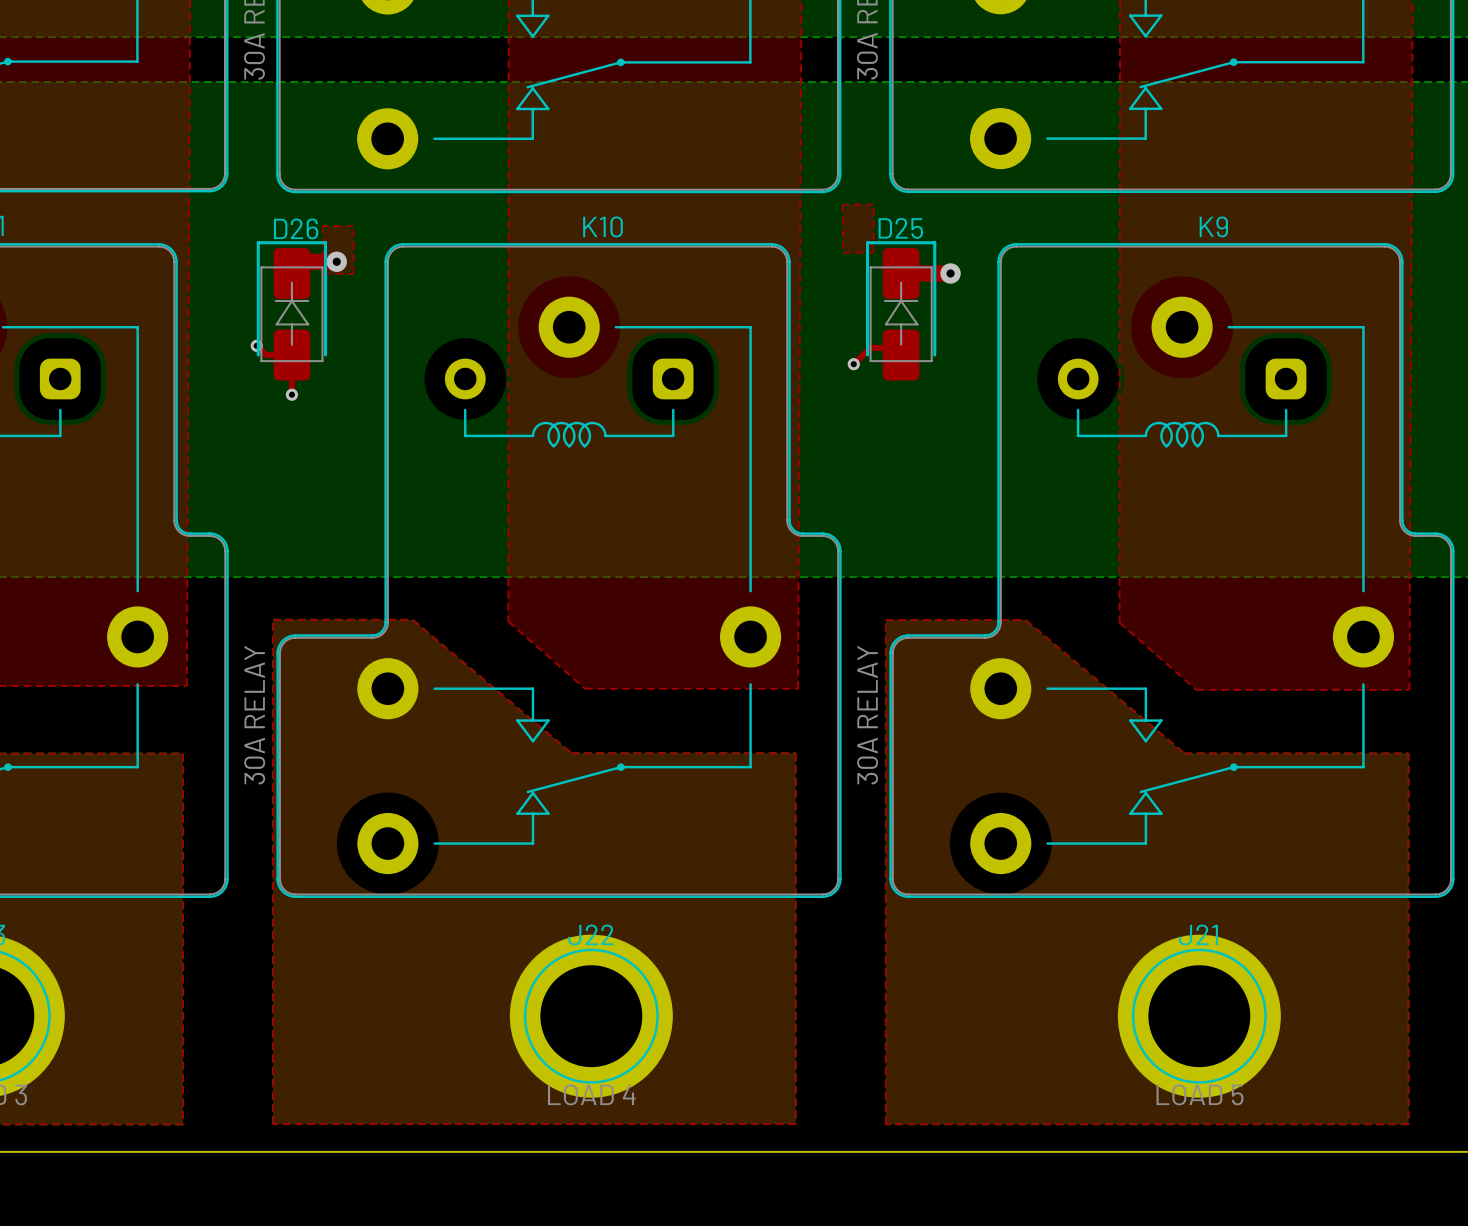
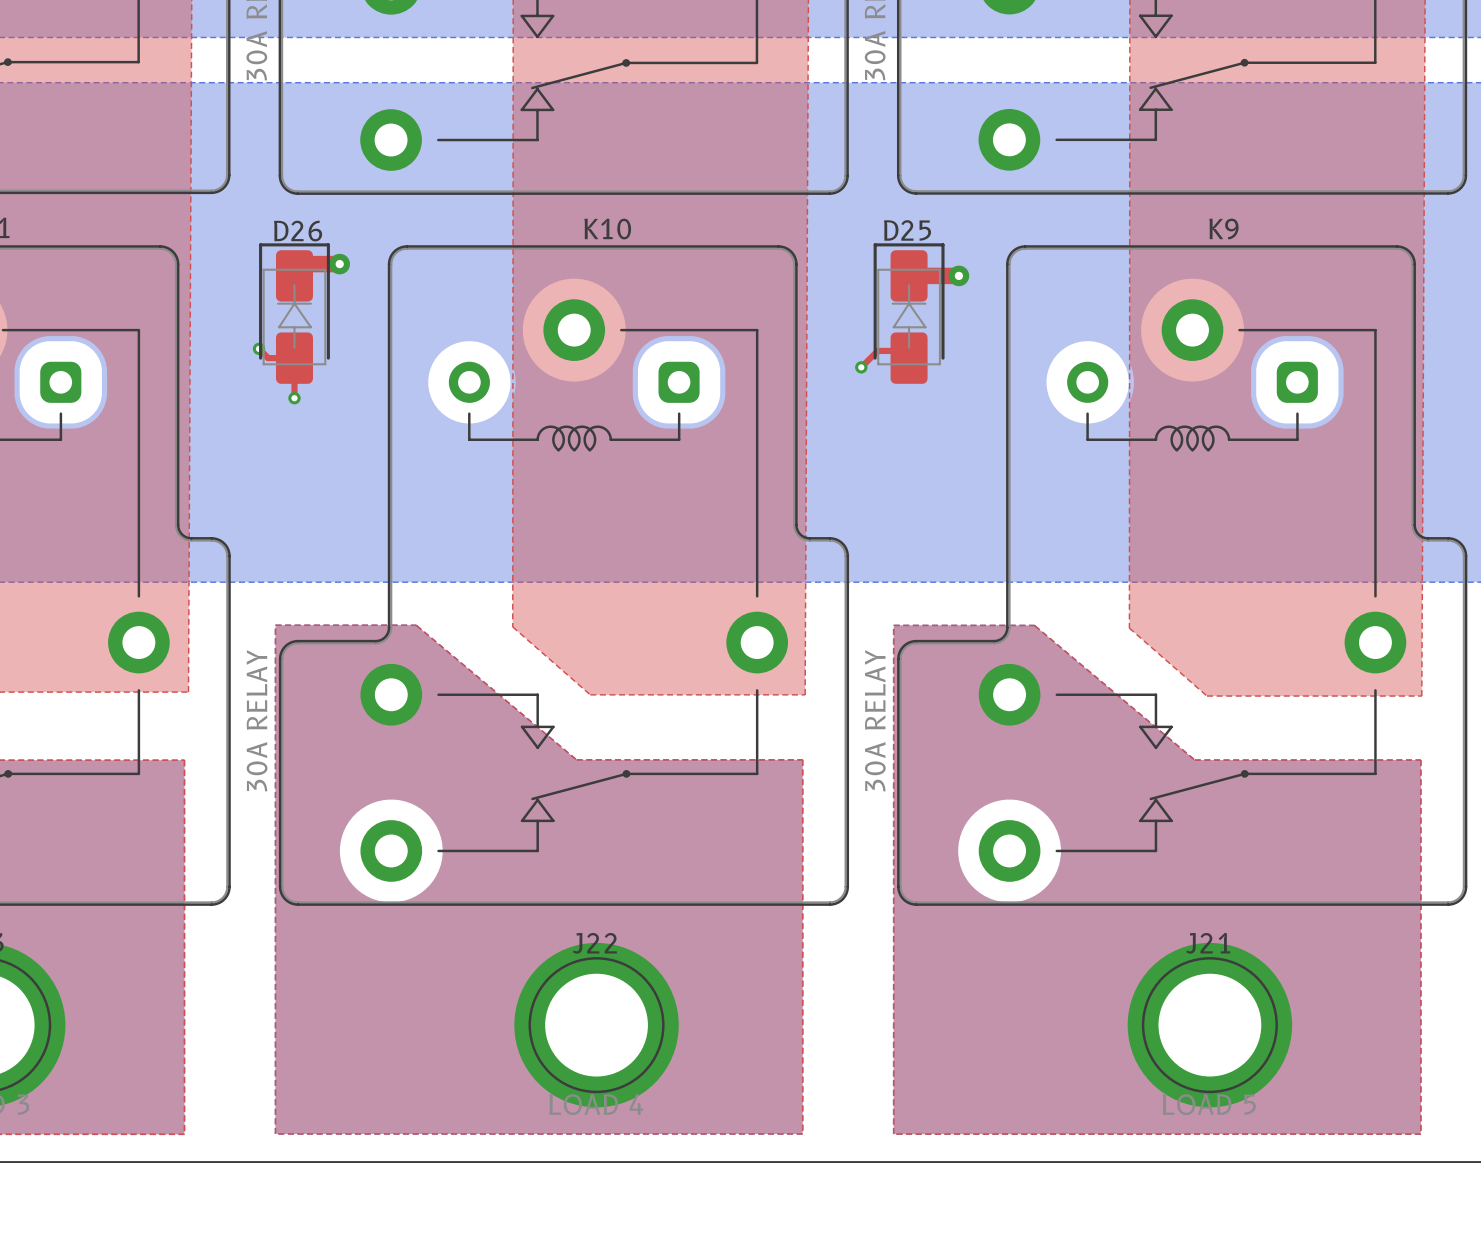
top zone outline: (843, 204) (843, 252) (873, 252) (873, 204) (843, 204) -> none
top zone outline: (322, 226) (322, 274) (353, 274) (353, 226) (322, 226) -> none

